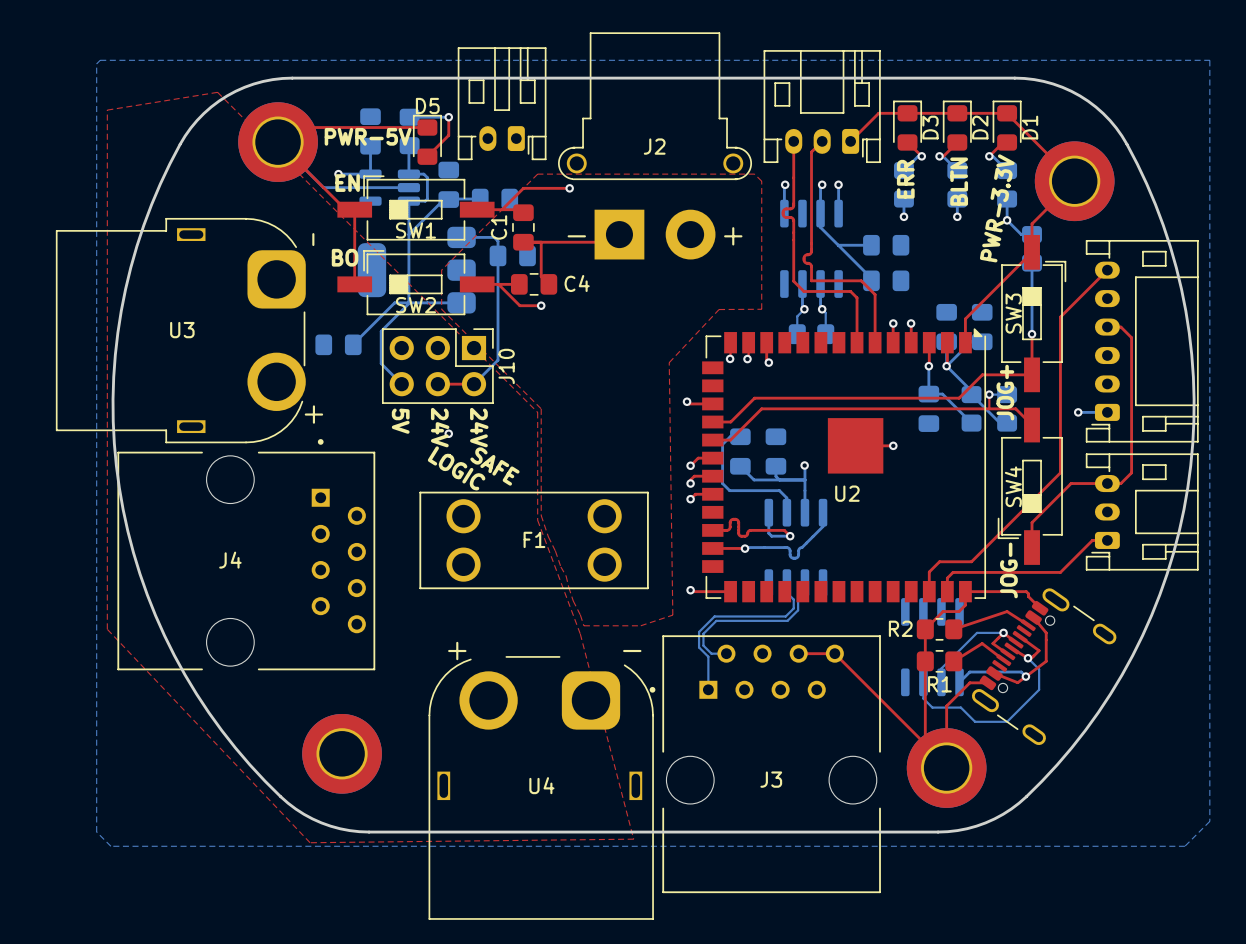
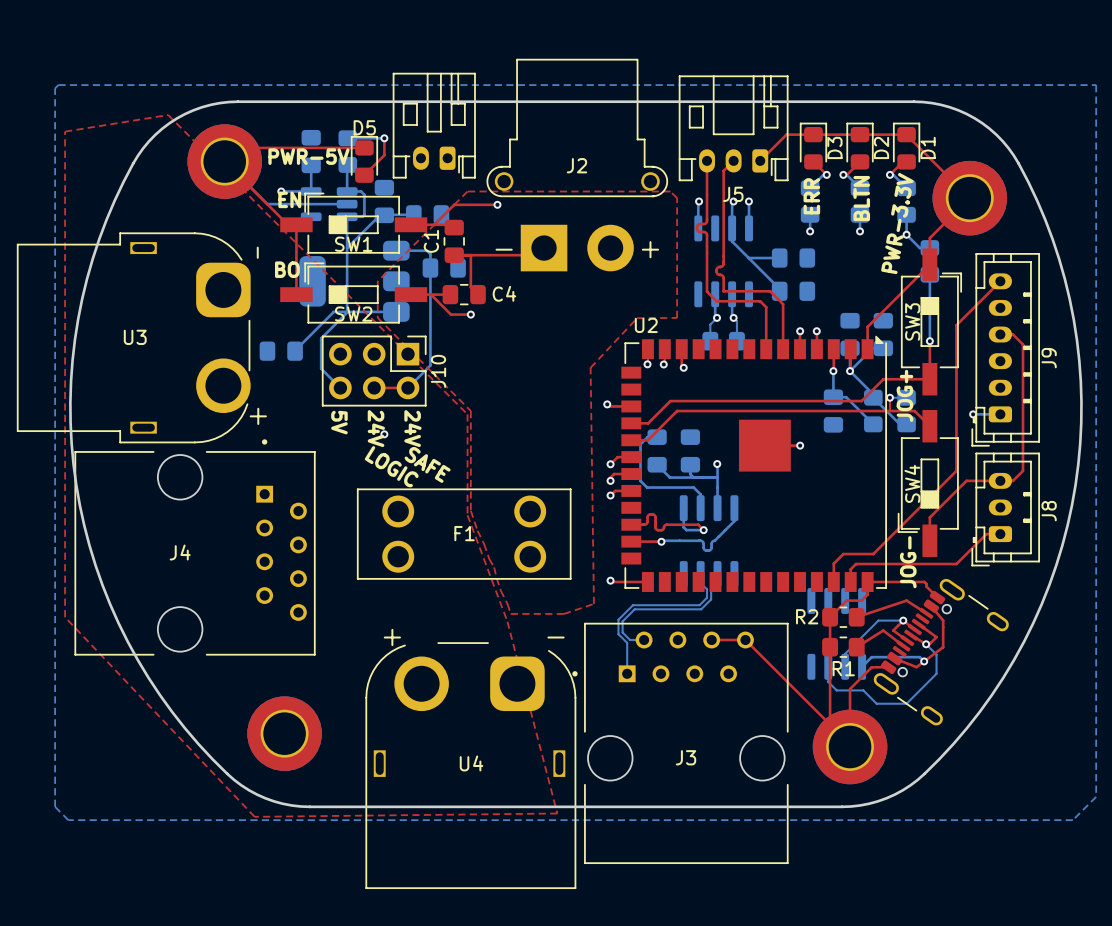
J5 name: none -> J5 (733, 194)
part: (1142, 341) -> none
J9: none -> (1005, 349)
U2 name position: U2 (847, 493) -> U2 (646, 325)
part: (1142, 511) -> none
J8: none -> (1005, 509)

